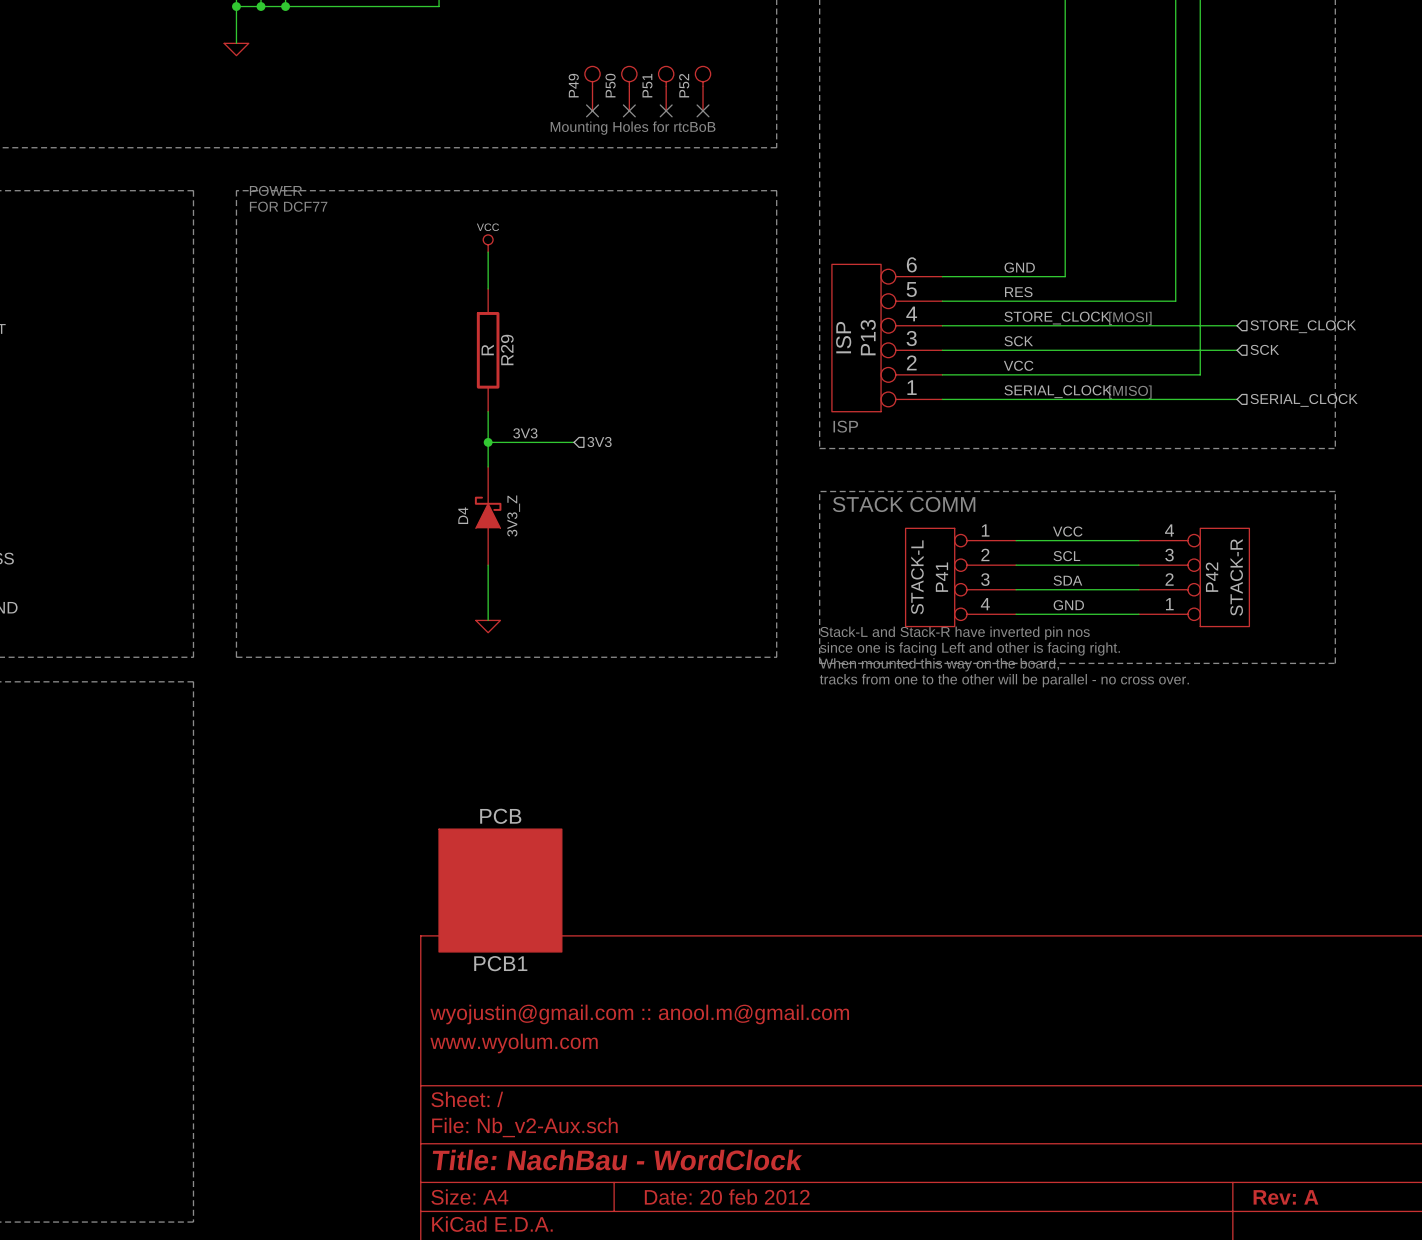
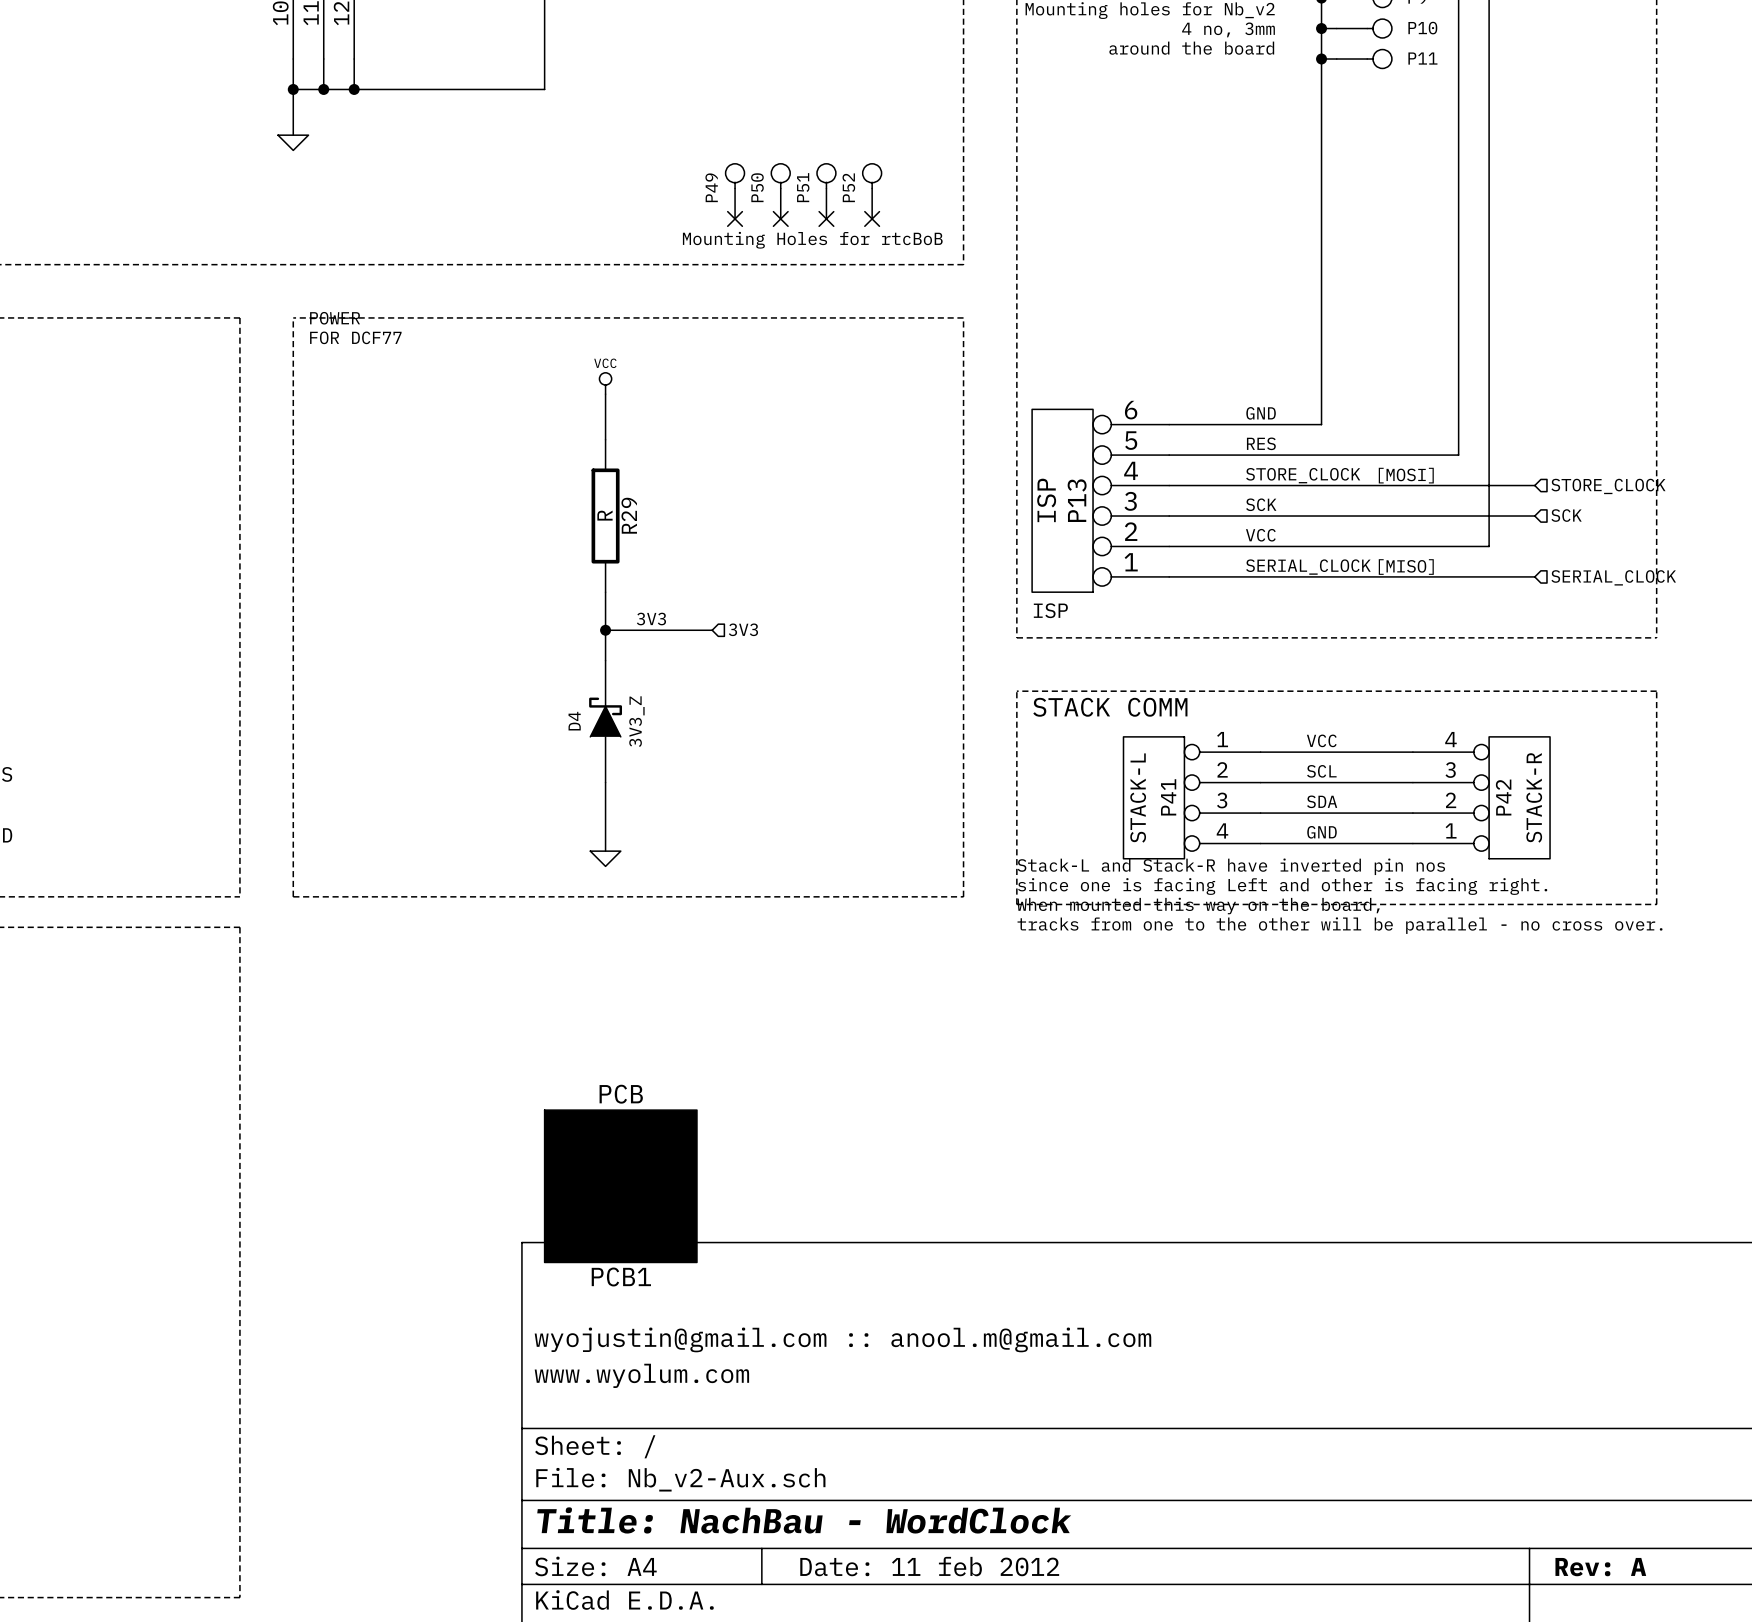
title block: Date: 20 feb 2012 (727, 1197) -> Date: 11 feb 2012 (929, 1566)

